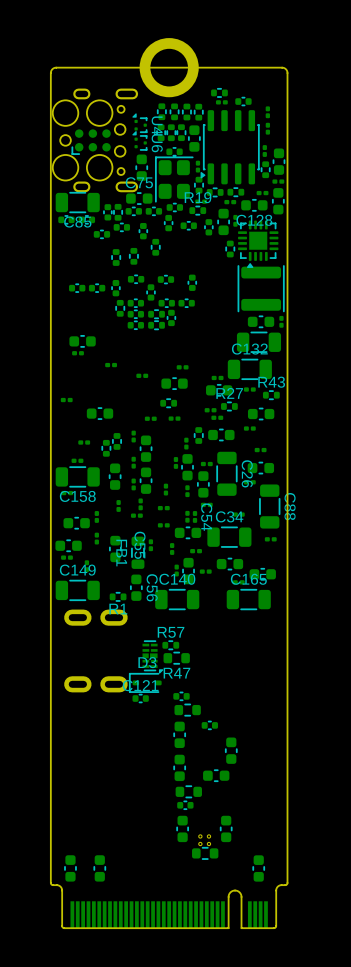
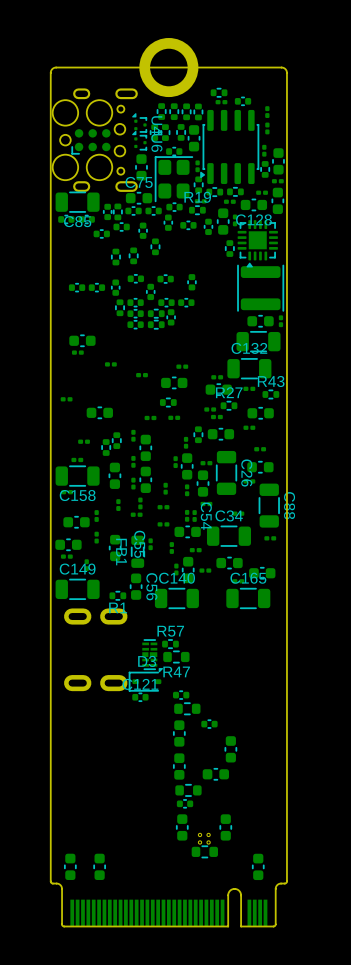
part: none -> (154, 132)
part: (161, 132) -> none
part: none -> (165, 132)
part: (171, 132) -> none

